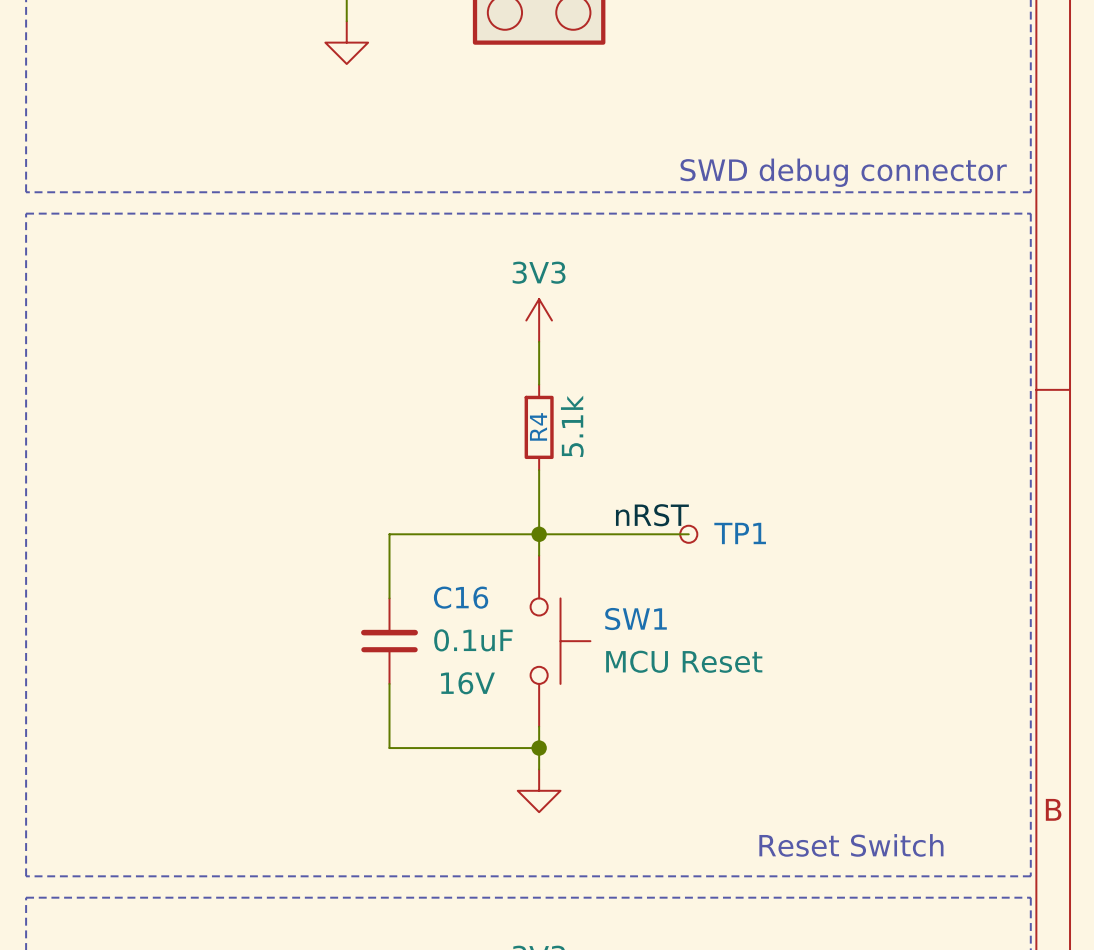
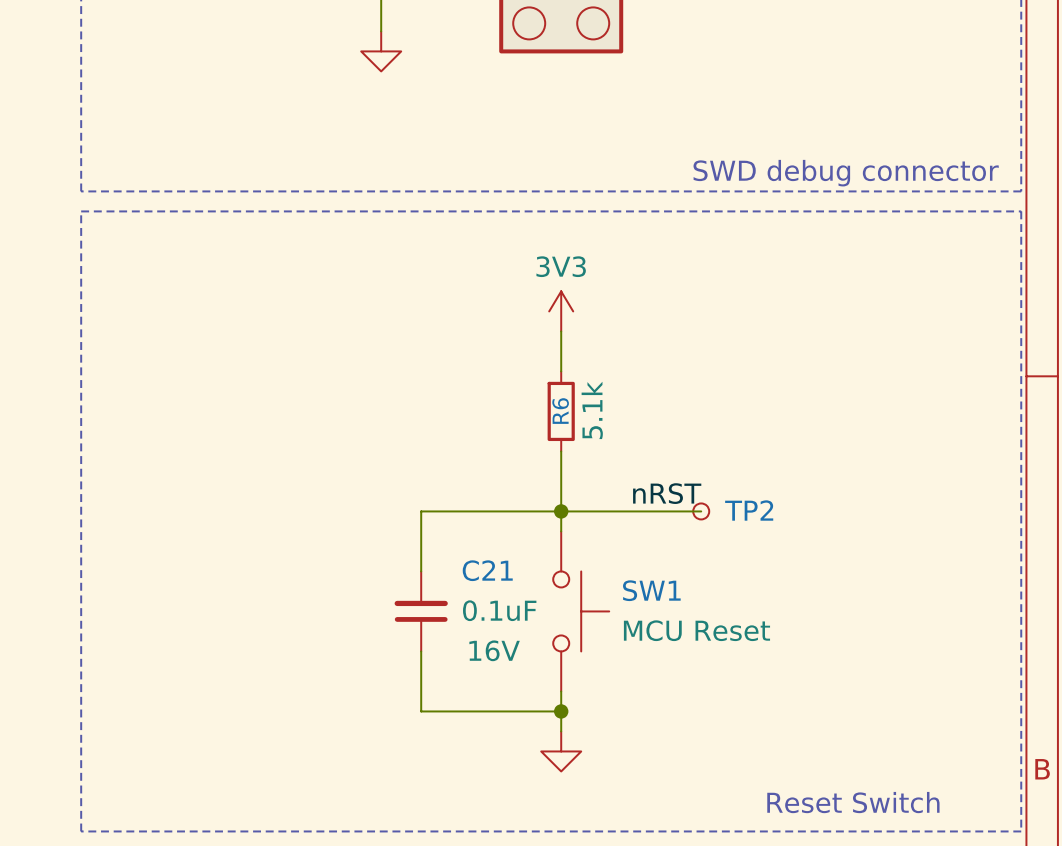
R4 name: R4 (538, 426) -> R6 (560, 411)
TP1 name: TP1 (740, 533) -> TP2 (749, 510)
C16 name: C16 (461, 597) -> C21 (487, 570)

